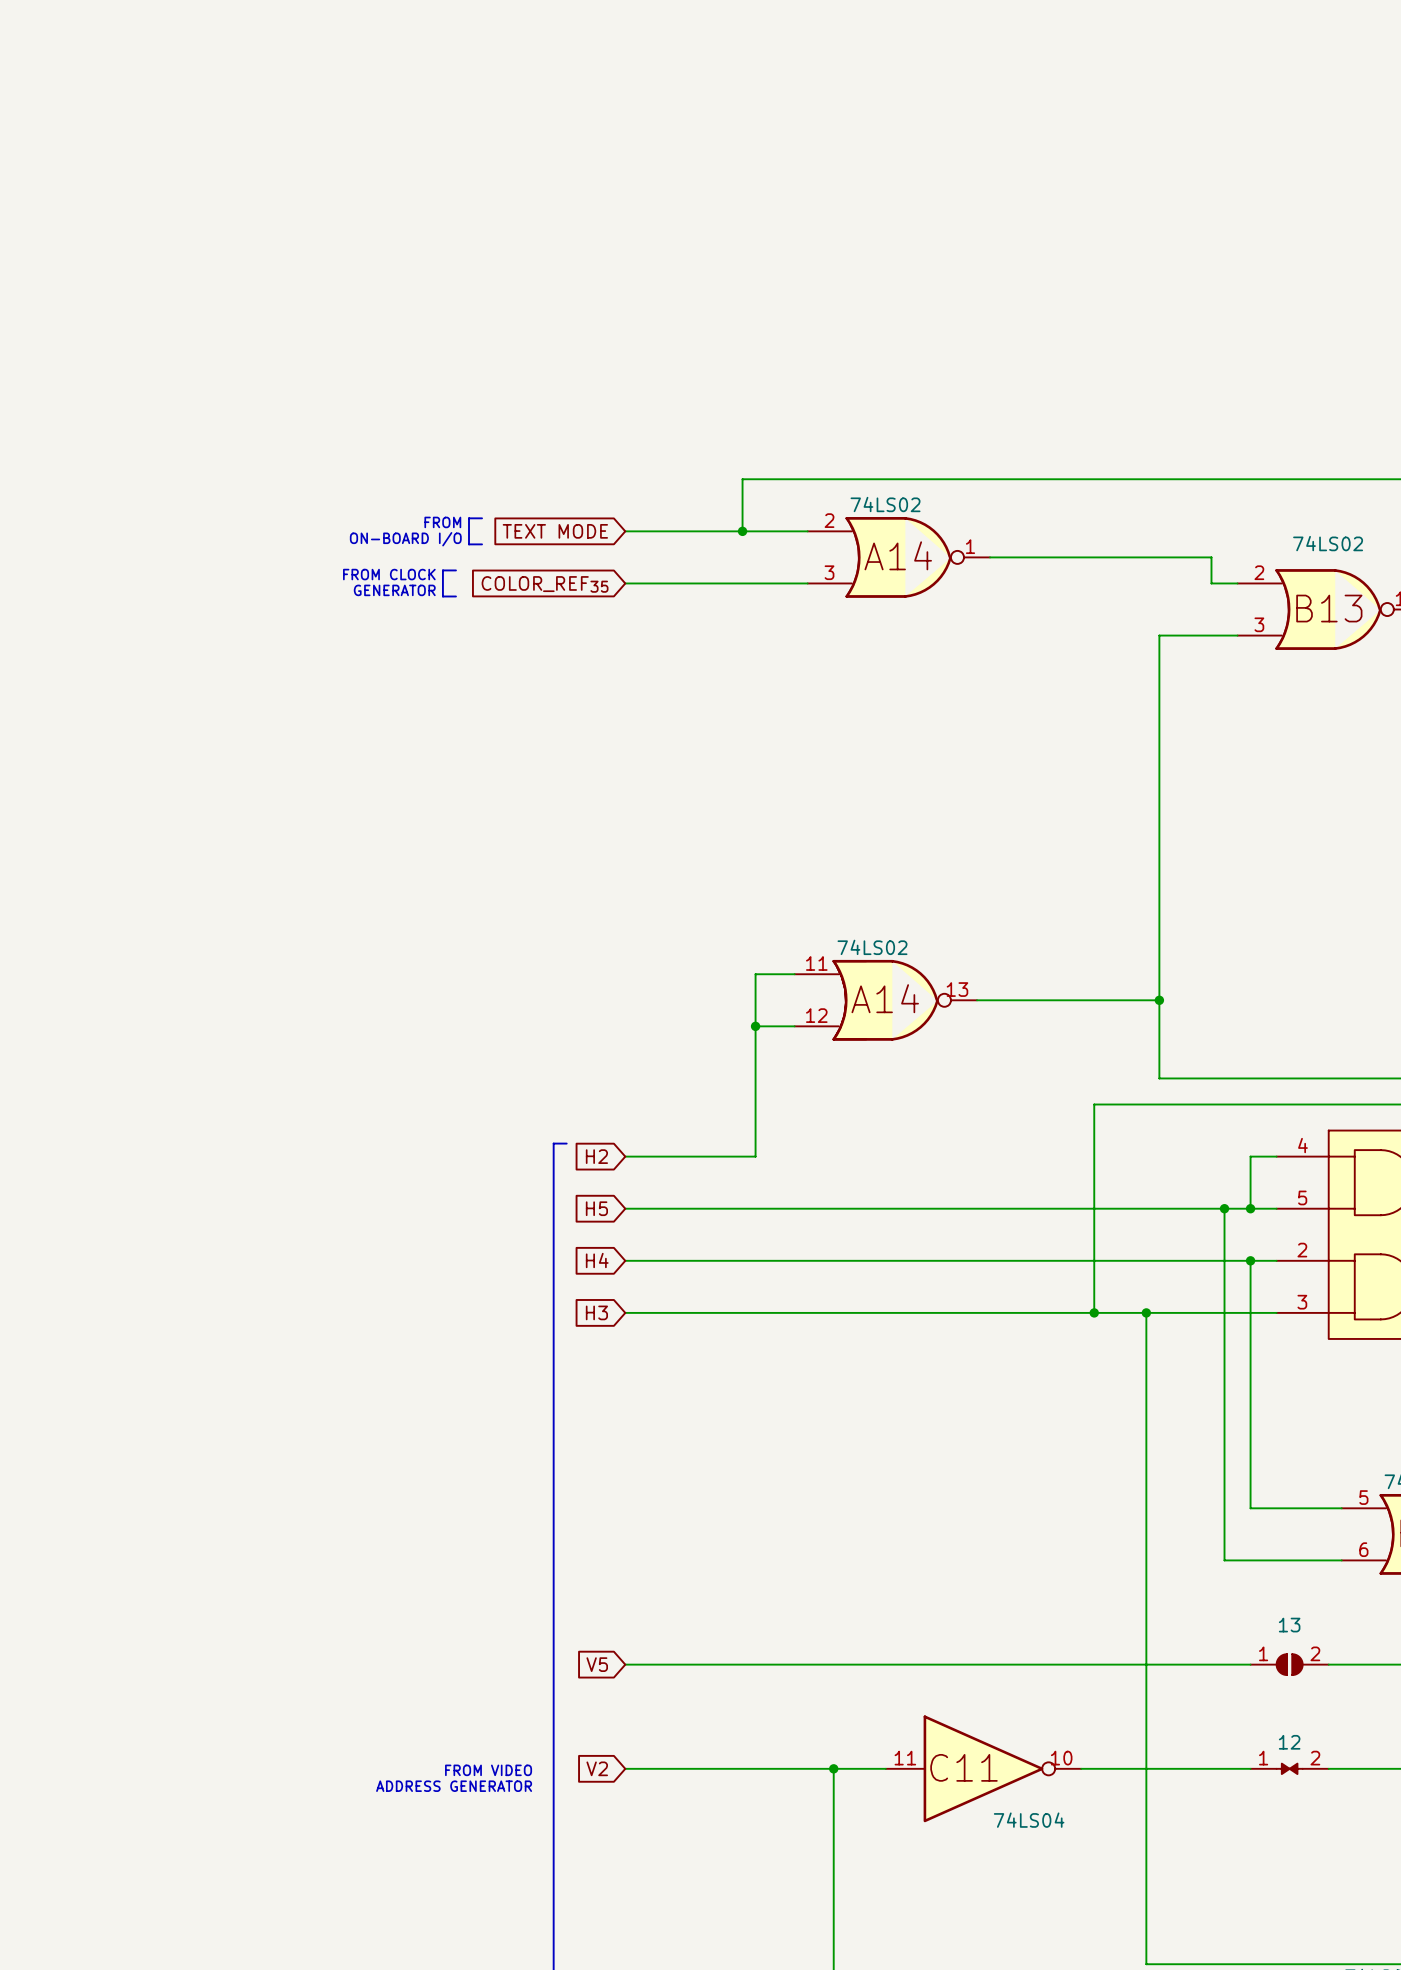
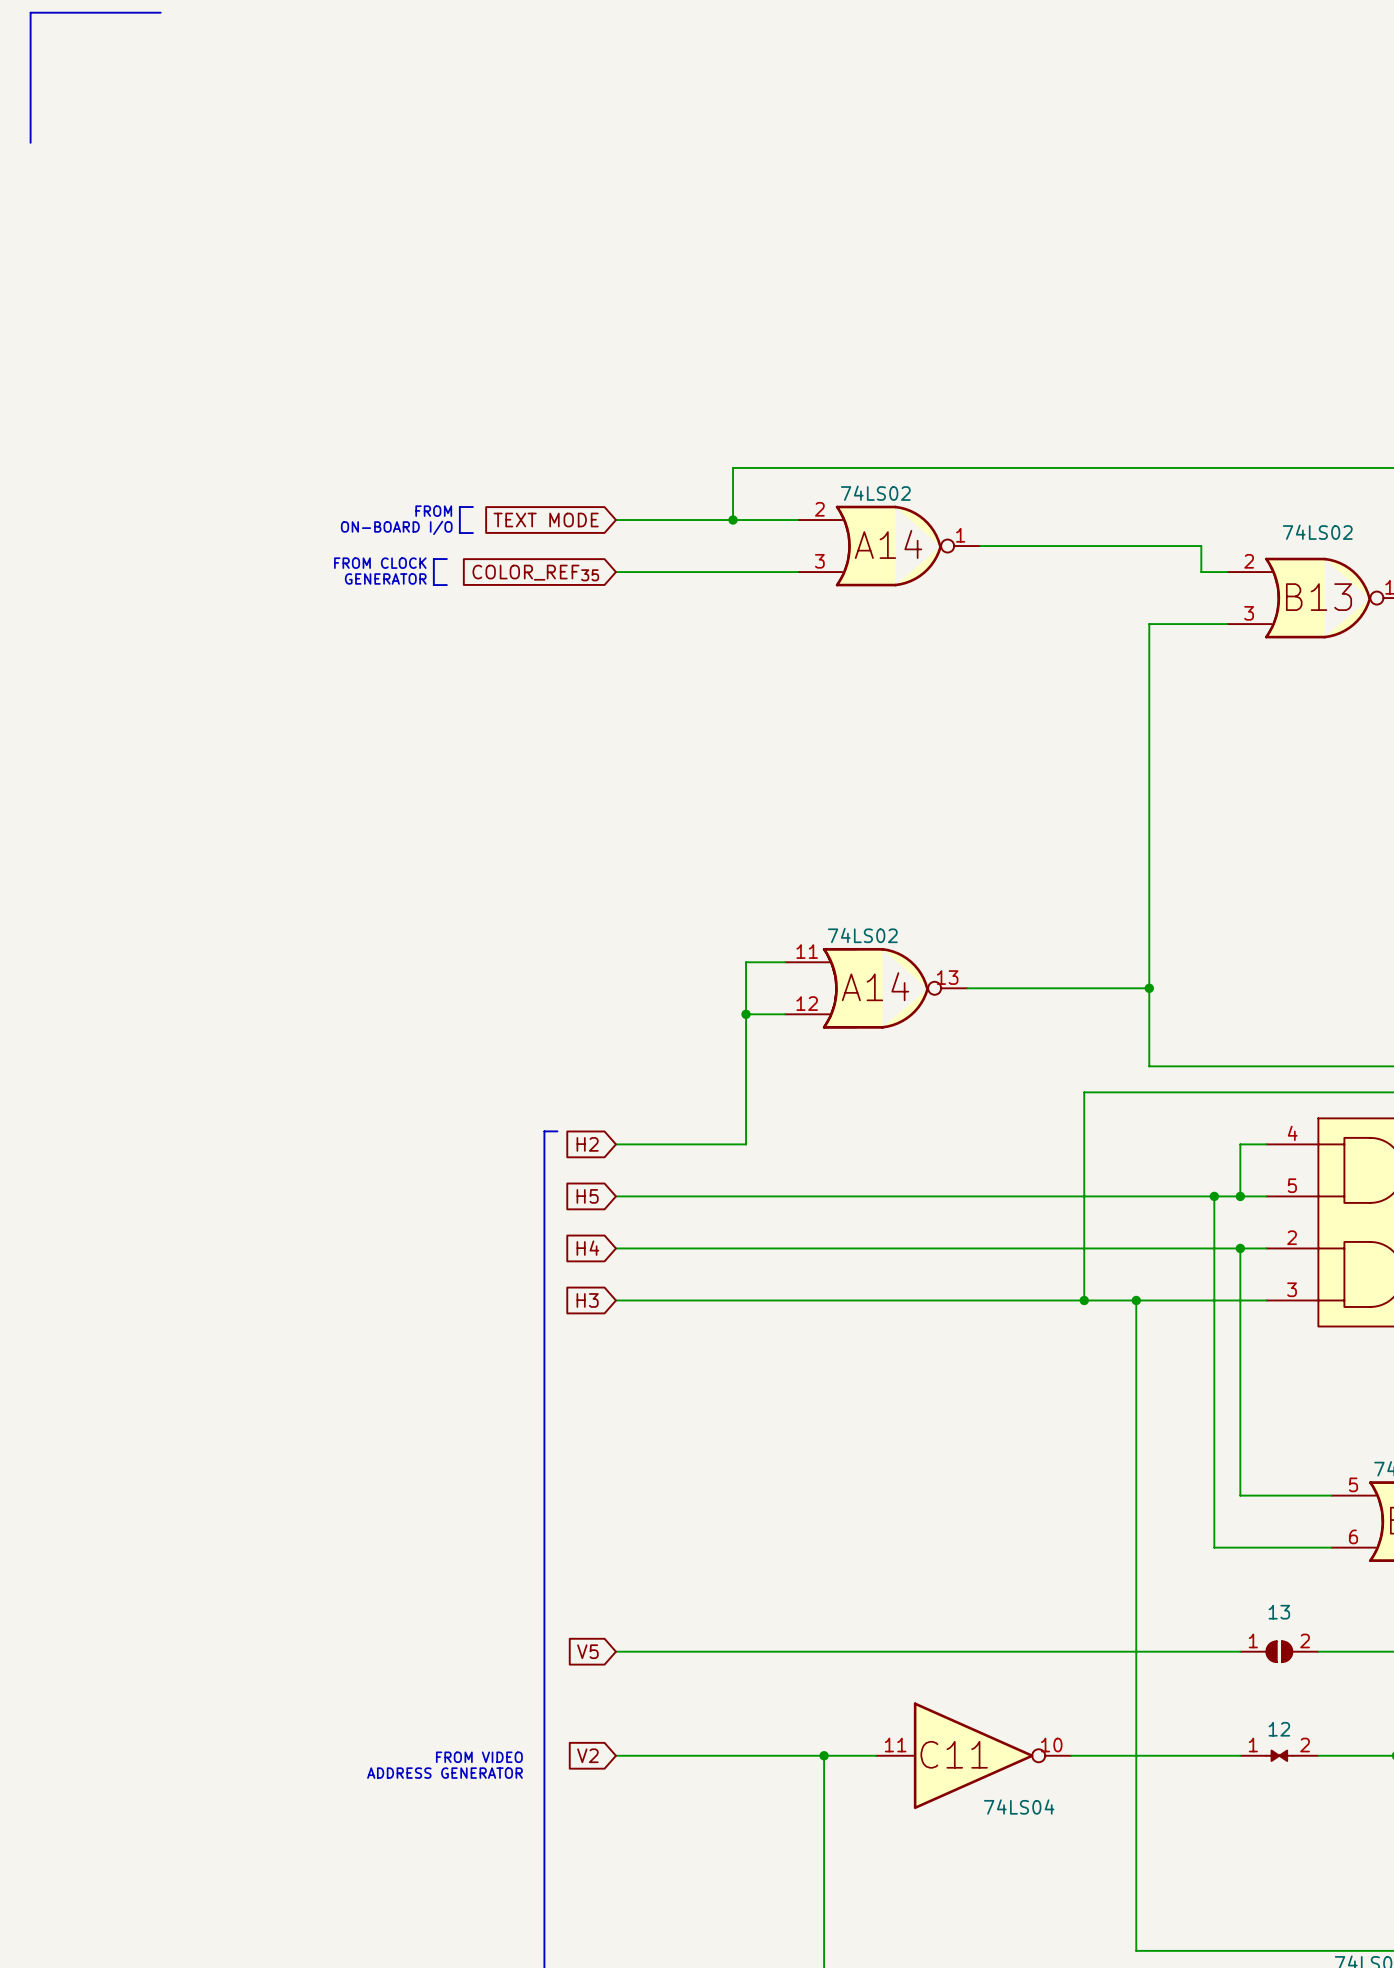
line: none -> (160, 12) (30, 12) (30, 142)

